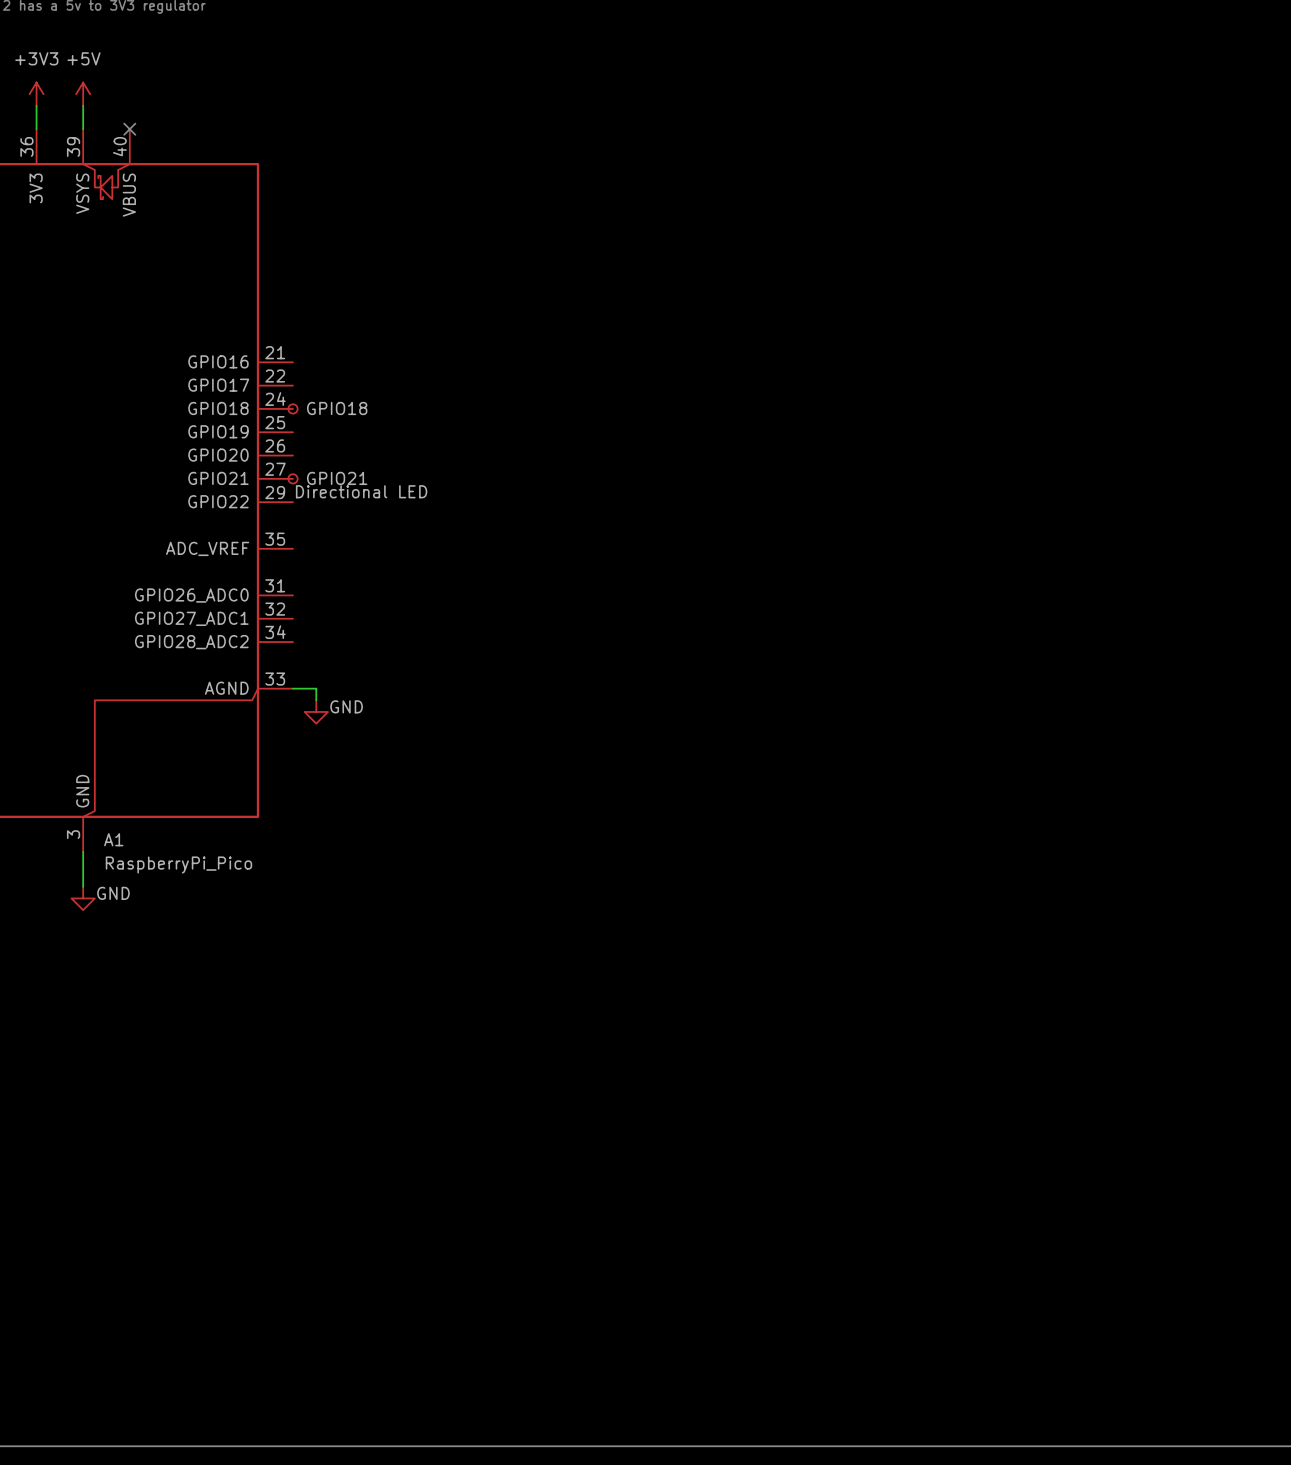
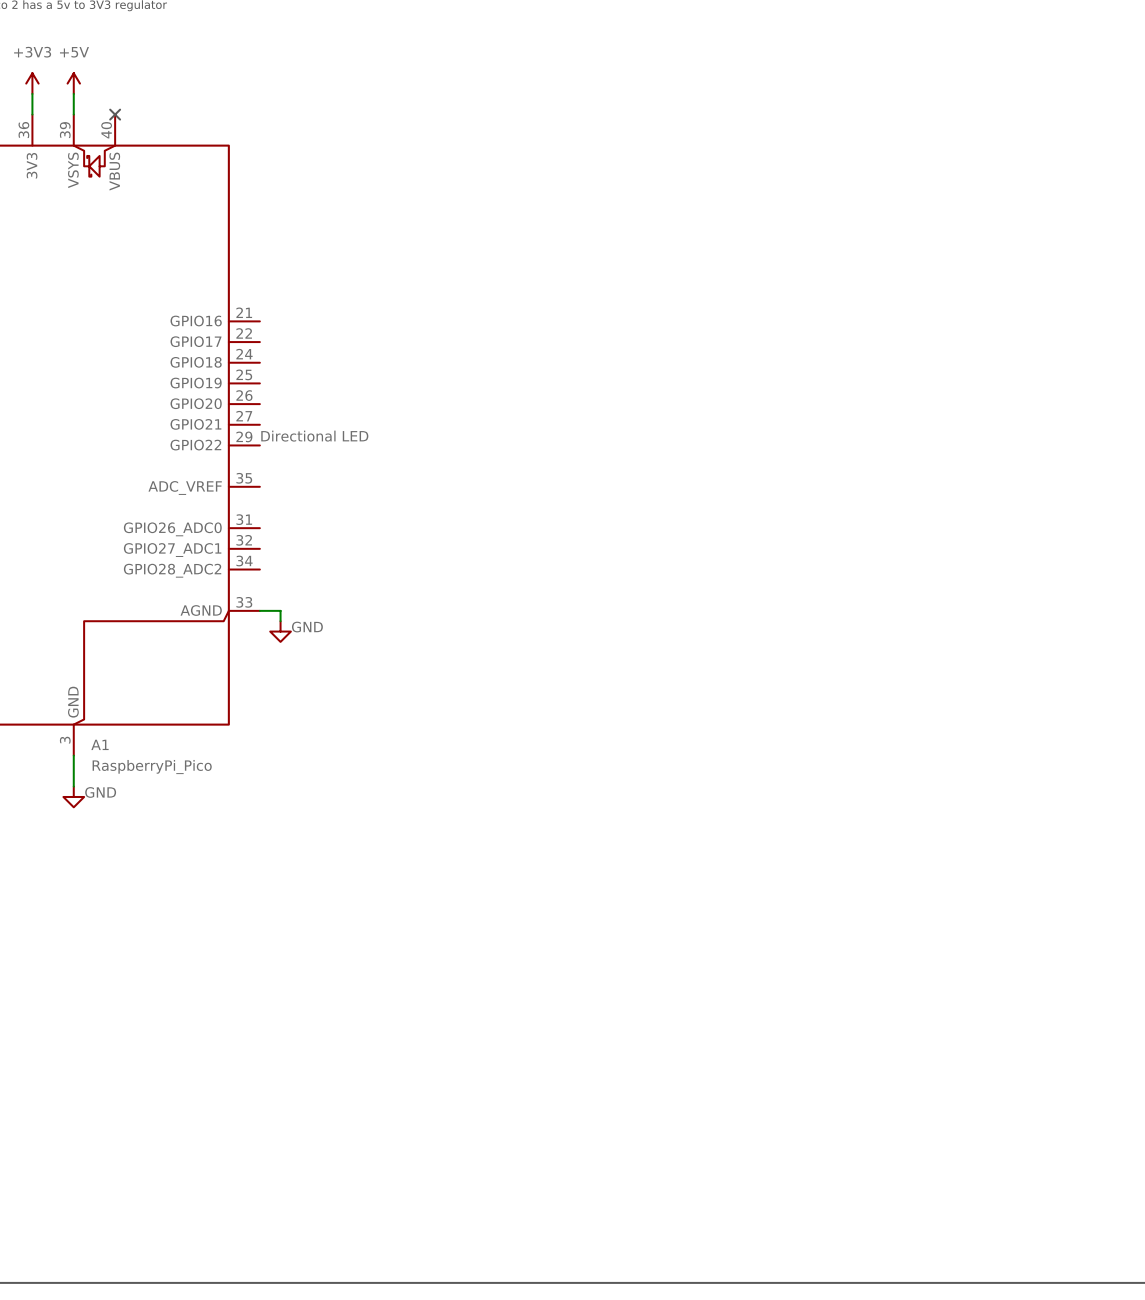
part: GPIO18 (292, 408) -> none
part: GPIO21 (292, 478) -> none

